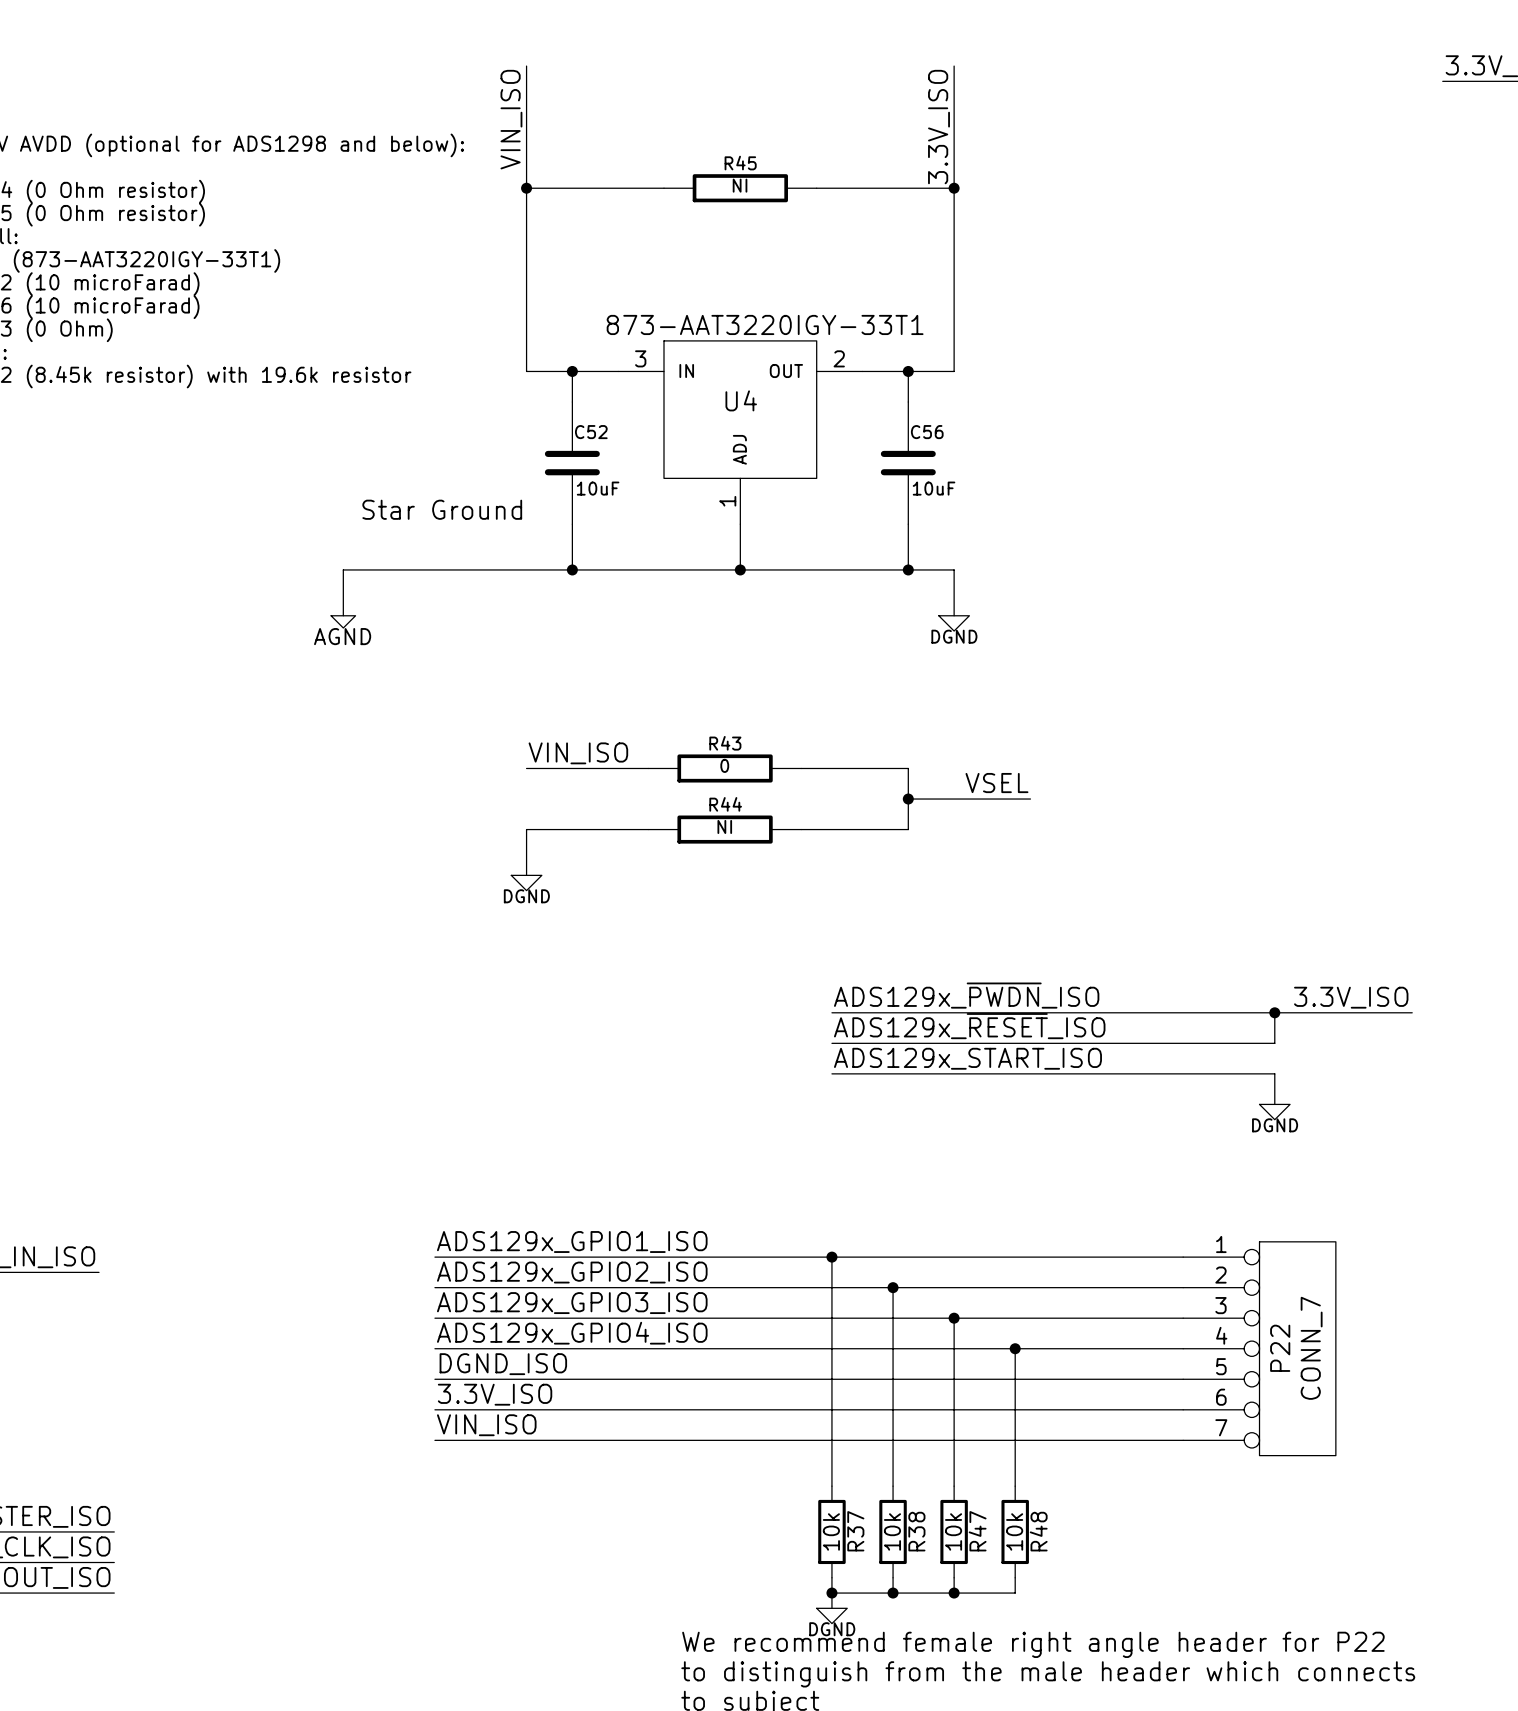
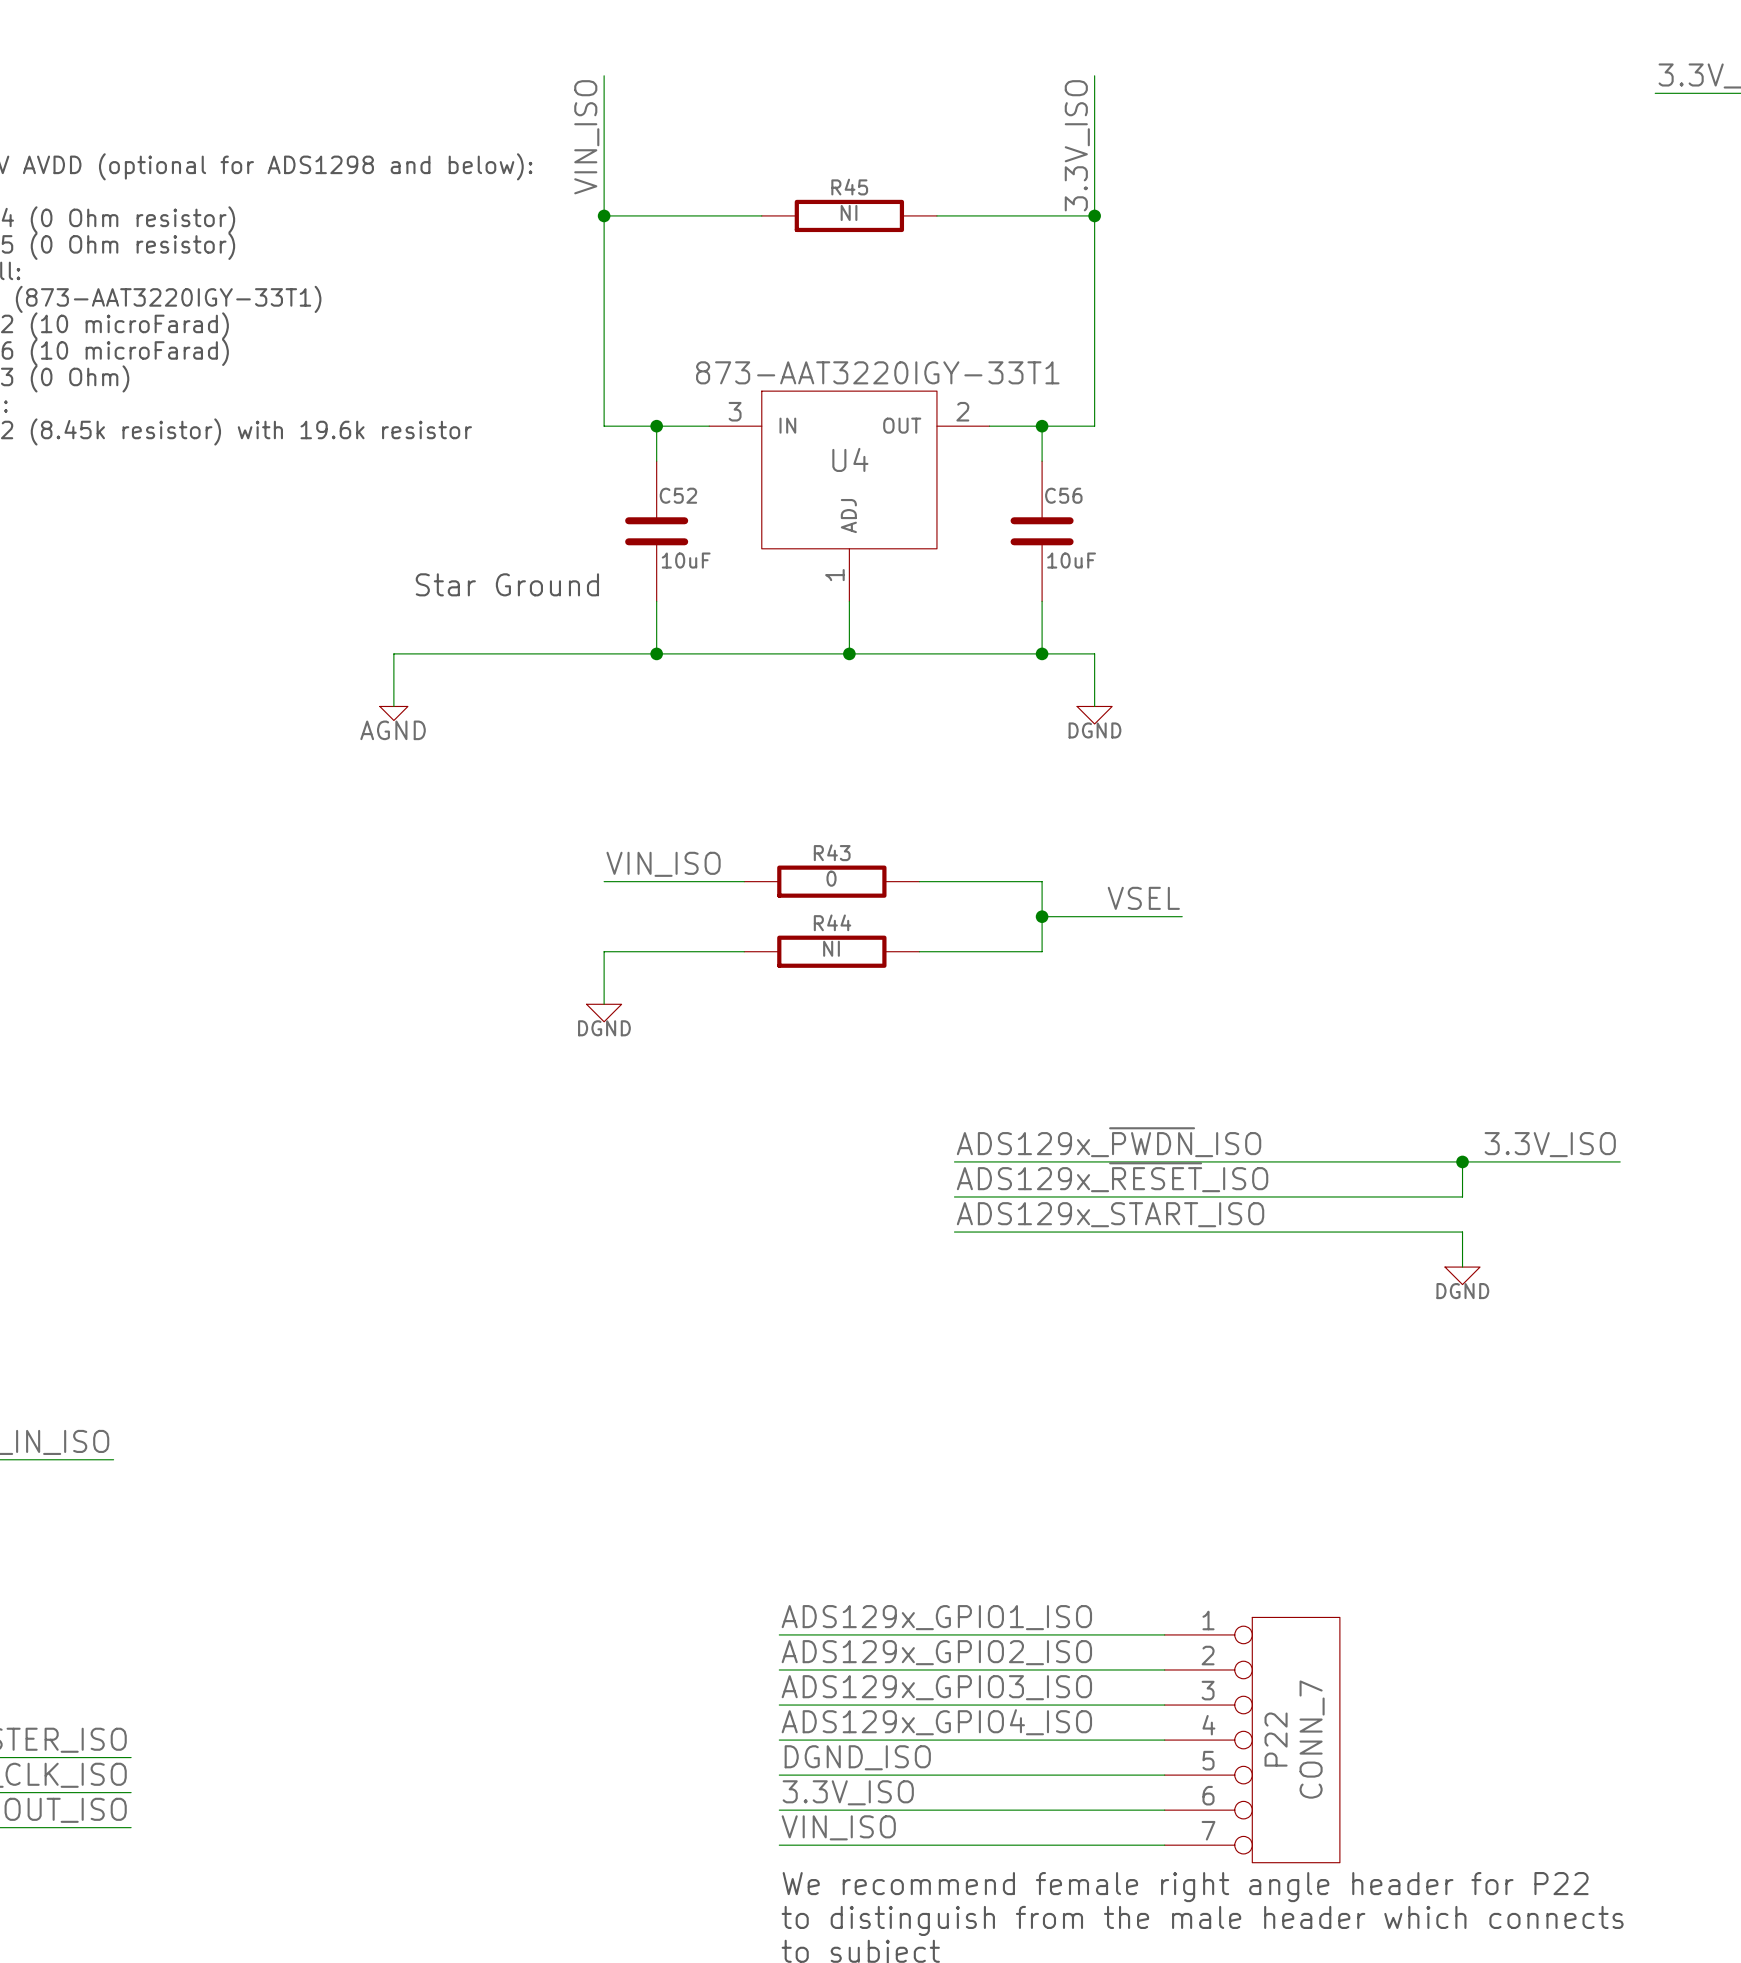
label position: ADS129x_GPIO1_ISO (572, 1242) -> ADS129x_GPIO1_ISO (936, 1617)
wire: (434, 1257) (1183, 1257) -> none
wire: (831, 1257) (831, 1486) -> none
junction: (831, 1257) -> none
label position: ADS129x_GPIO2_ISO (572, 1272) -> ADS129x_GPIO2_ISO (936, 1652)
wire: (434, 1287) (1183, 1287) -> none
wire: (893, 1287) (893, 1486) -> none
junction: (893, 1287) -> none
label position: ADS129x_GPIO3_ISO (572, 1303) -> ADS129x_GPIO3_ISO (936, 1687)
wire: (434, 1318) (1183, 1318) -> none
wire: (954, 1318) (954, 1486) -> none
junction: (954, 1318) -> none
label position: ADS129x_GPIO4_ISO (572, 1333) -> ADS129x_GPIO4_ISO (936, 1722)
wire: (434, 1348) (1183, 1348) -> none
wire: (1015, 1348) (1015, 1486) -> (779, 1705) (1164, 1705)
junction: (1015, 1348) -> none
P22 position: (1259, 1348) -> (1252, 1740)
label position: DGND_ISO (503, 1364) -> DGND_ISO (857, 1757)
wire: (434, 1379) (1183, 1379) -> none
label position: 3.3V_ISO (495, 1394) -> 3.3V_ISO (848, 1792)
wire: (434, 1409) (1183, 1409) -> none
label position: VIN_ISO (486, 1425) -> VIN_ISO (838, 1827)
wire: none -> (779, 1634) (1164, 1634)
wire: (434, 1440) (1183, 1440) -> none
wire: none -> (779, 1669) (1164, 1669)
wire: none -> (779, 1740) (1164, 1740)
R37: 10k (831, 1531) -> none
R38: 10k (893, 1531) -> none
R47: 10k (954, 1531) -> none
R48: 10k (1015, 1531) -> none
wire: none -> (779, 1775) (1164, 1775)
wire: (831, 1577) (831, 1608) -> none
wire: (893, 1577) (893, 1593) -> none
wire: (954, 1577) (954, 1593) -> none
wire: (1015, 1577) (1015, 1593) (831, 1593) -> (1164, 1810) (779, 1810)
junction: (831, 1593) -> none
junction: (893, 1593) -> none
junction: (954, 1593) -> none
wire: none -> (779, 1845) (1164, 1845)
power symbol: DGND (831, 1615) -> none

